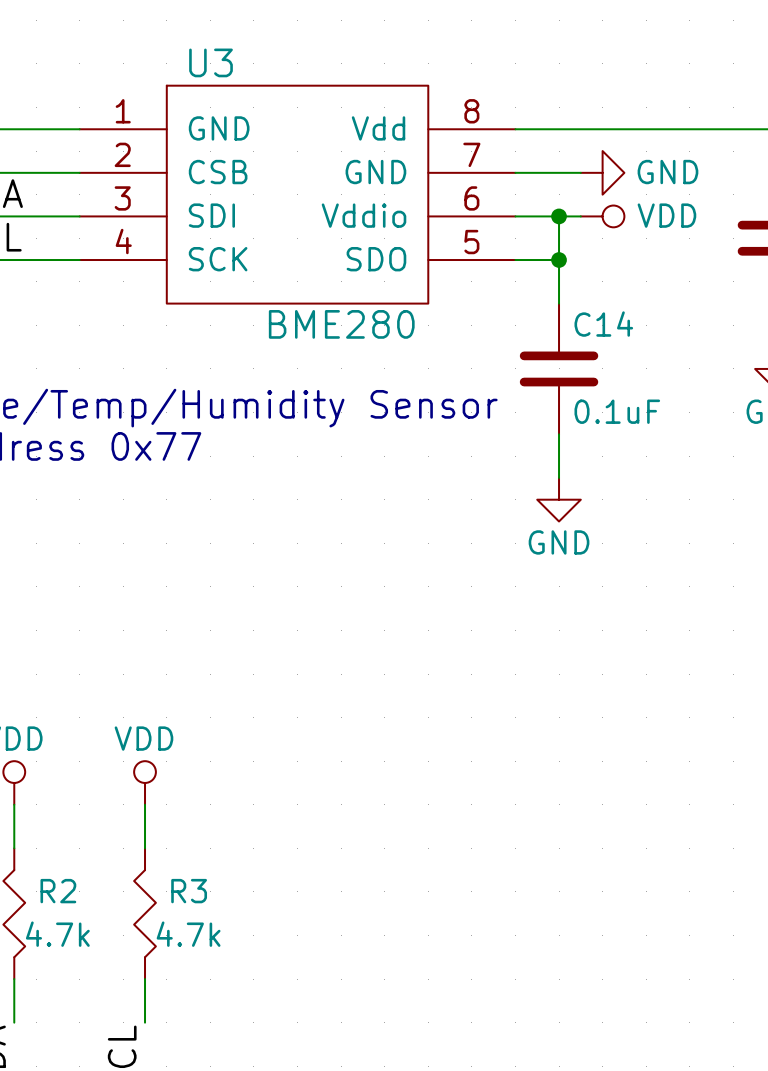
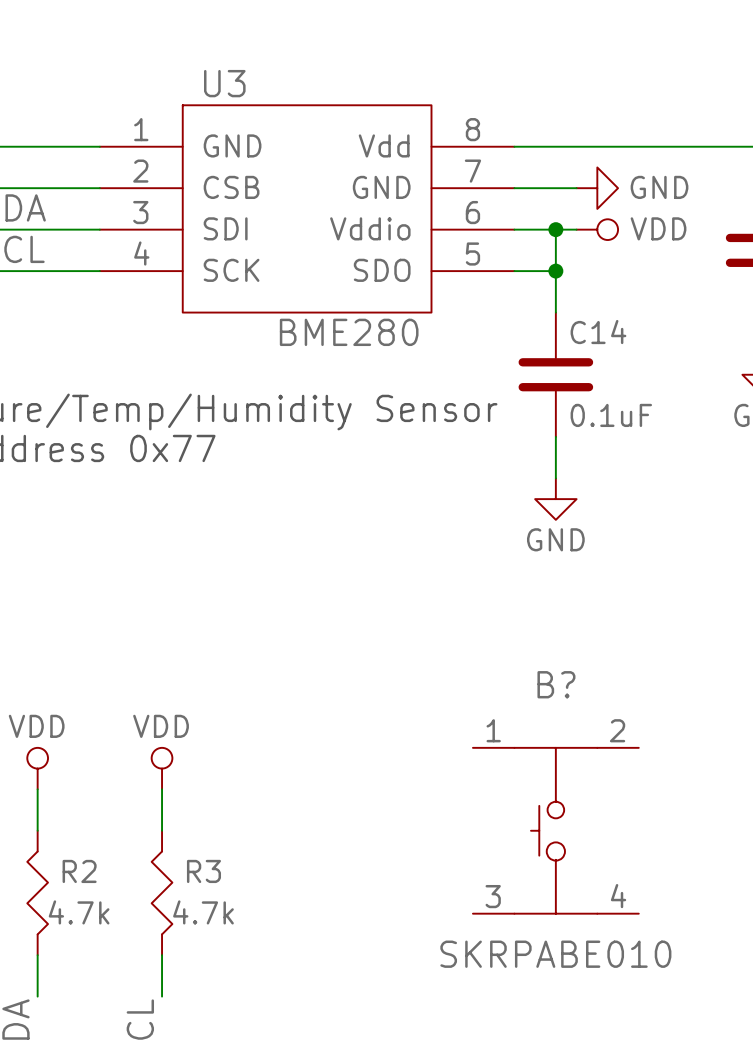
B?: none -> SKRPABE010 (555, 830)

